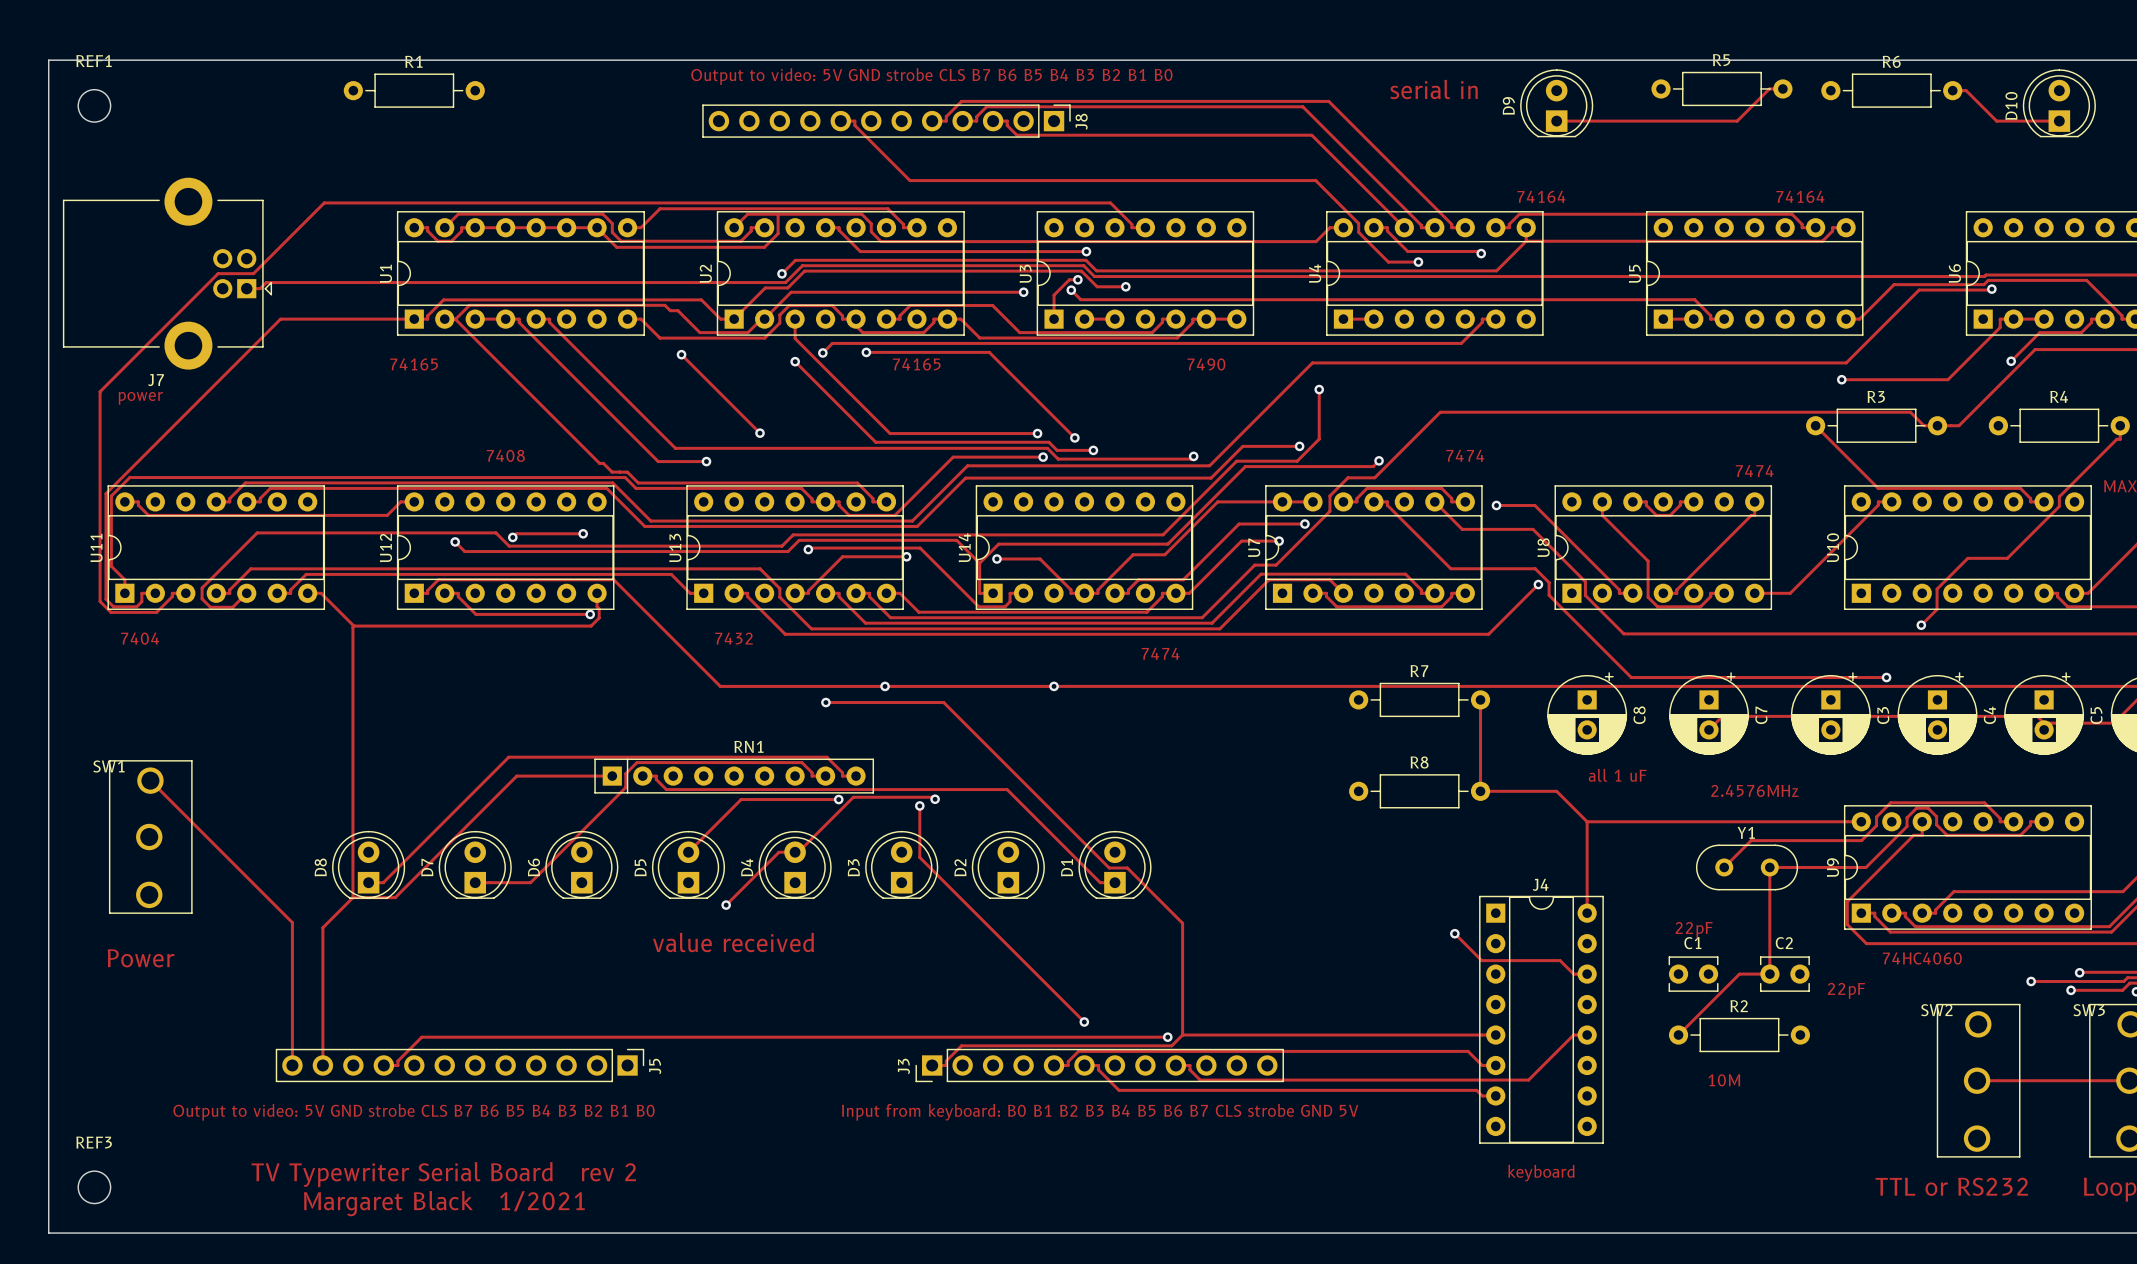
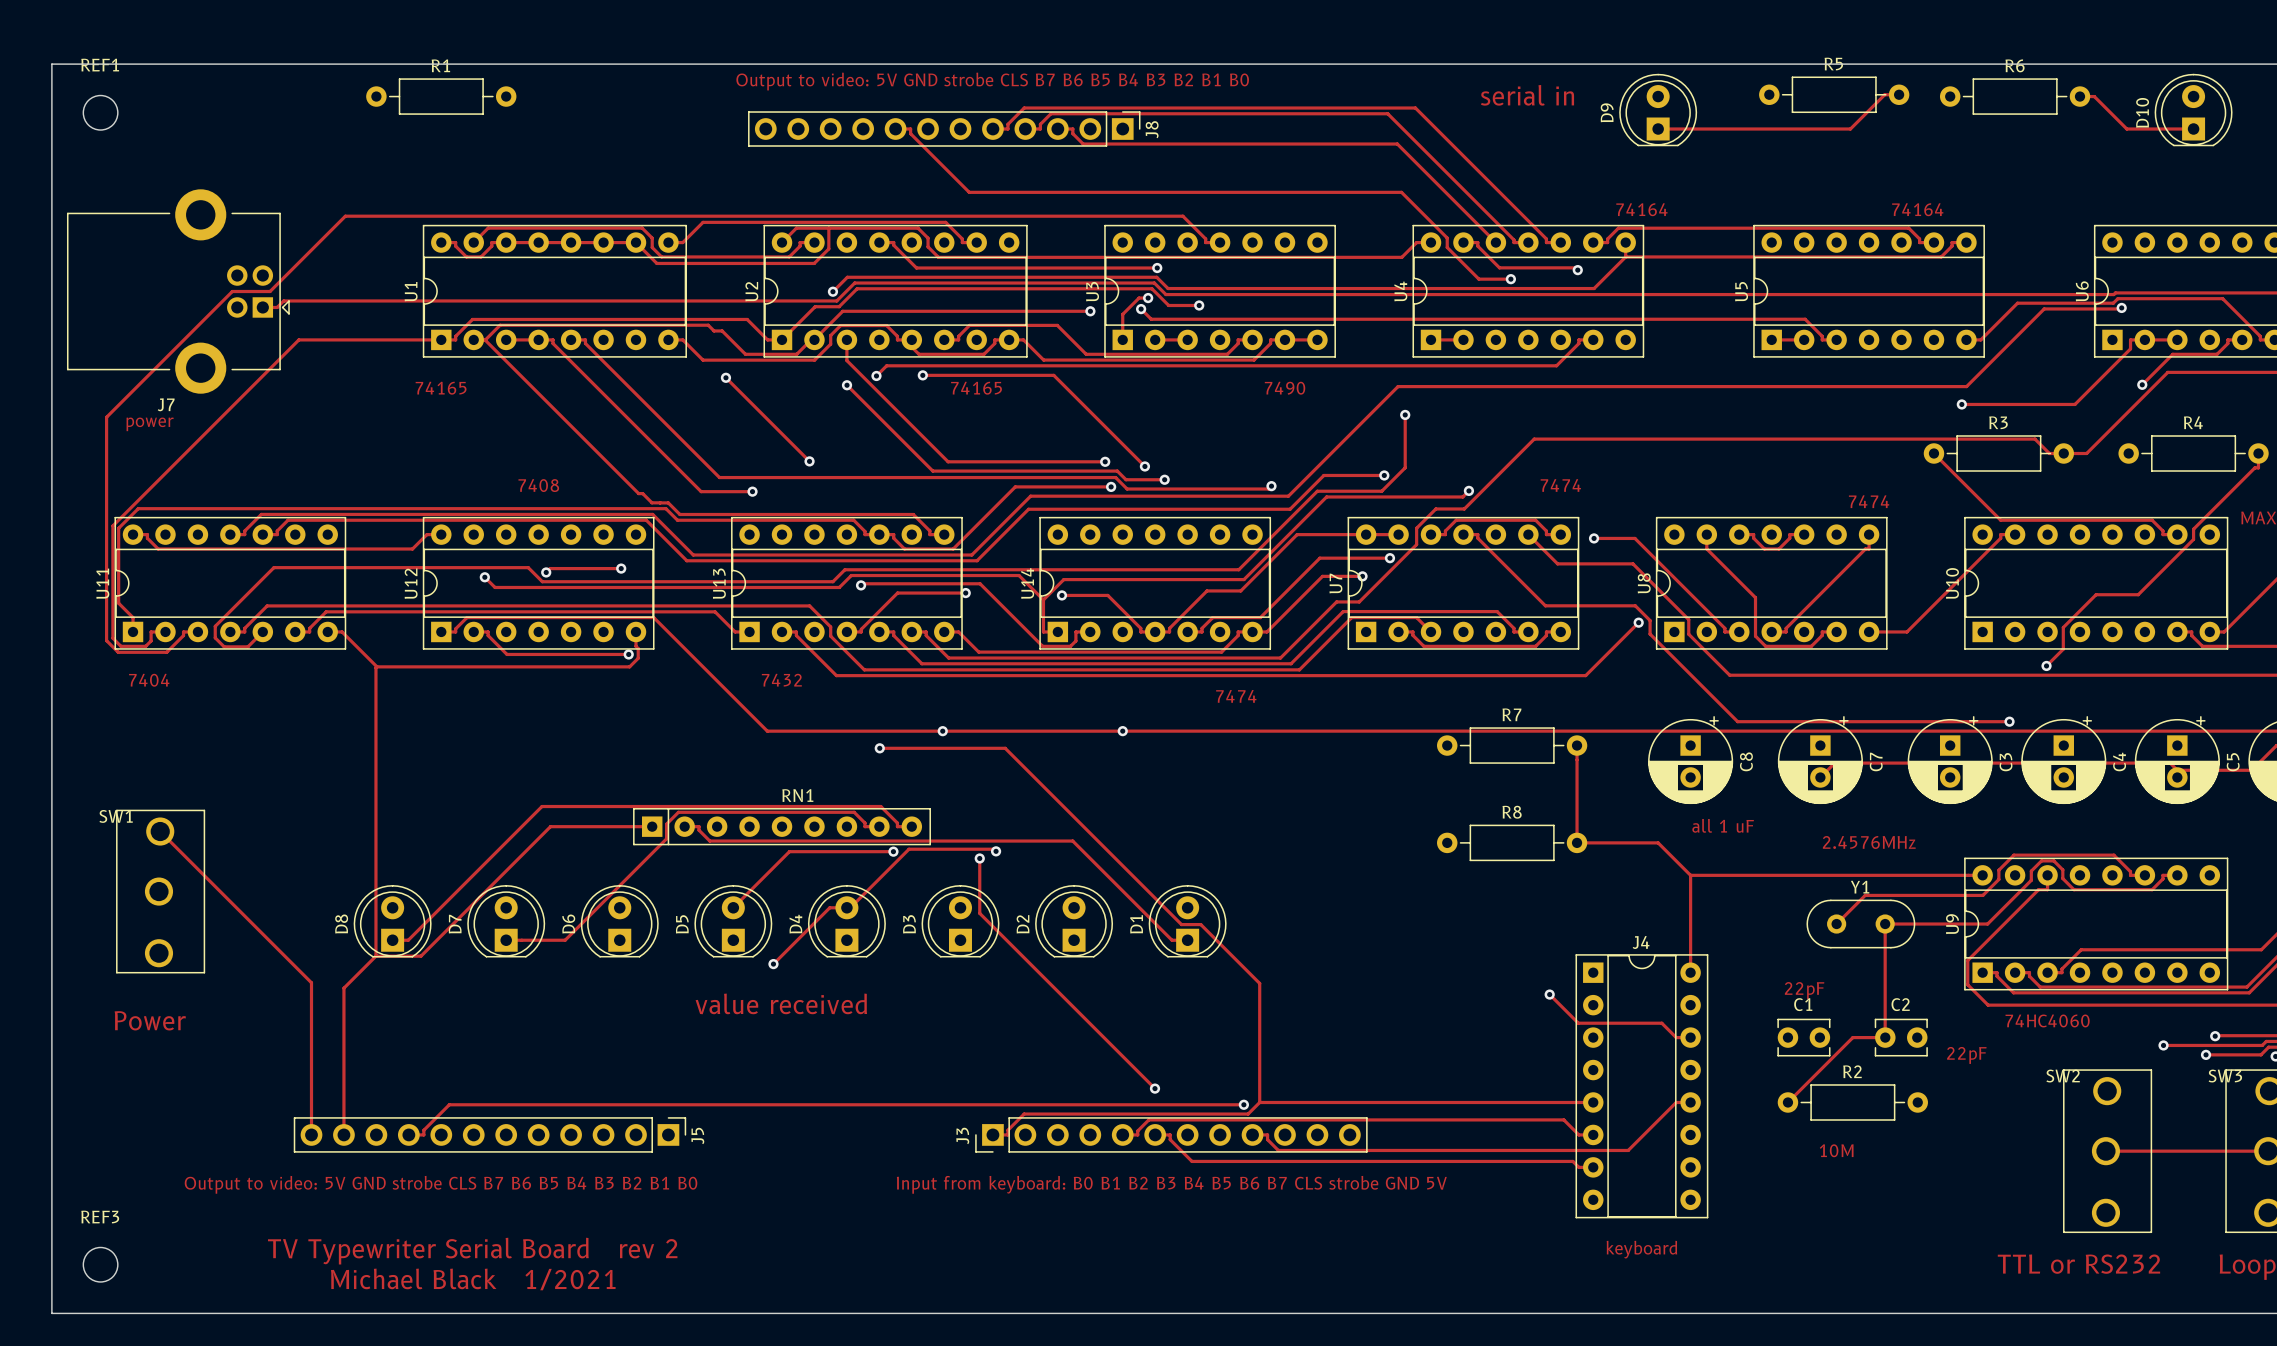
text: Margaret Black 1/2021 (444, 1203) -> Michael Black 1/2021 (473, 1279)

